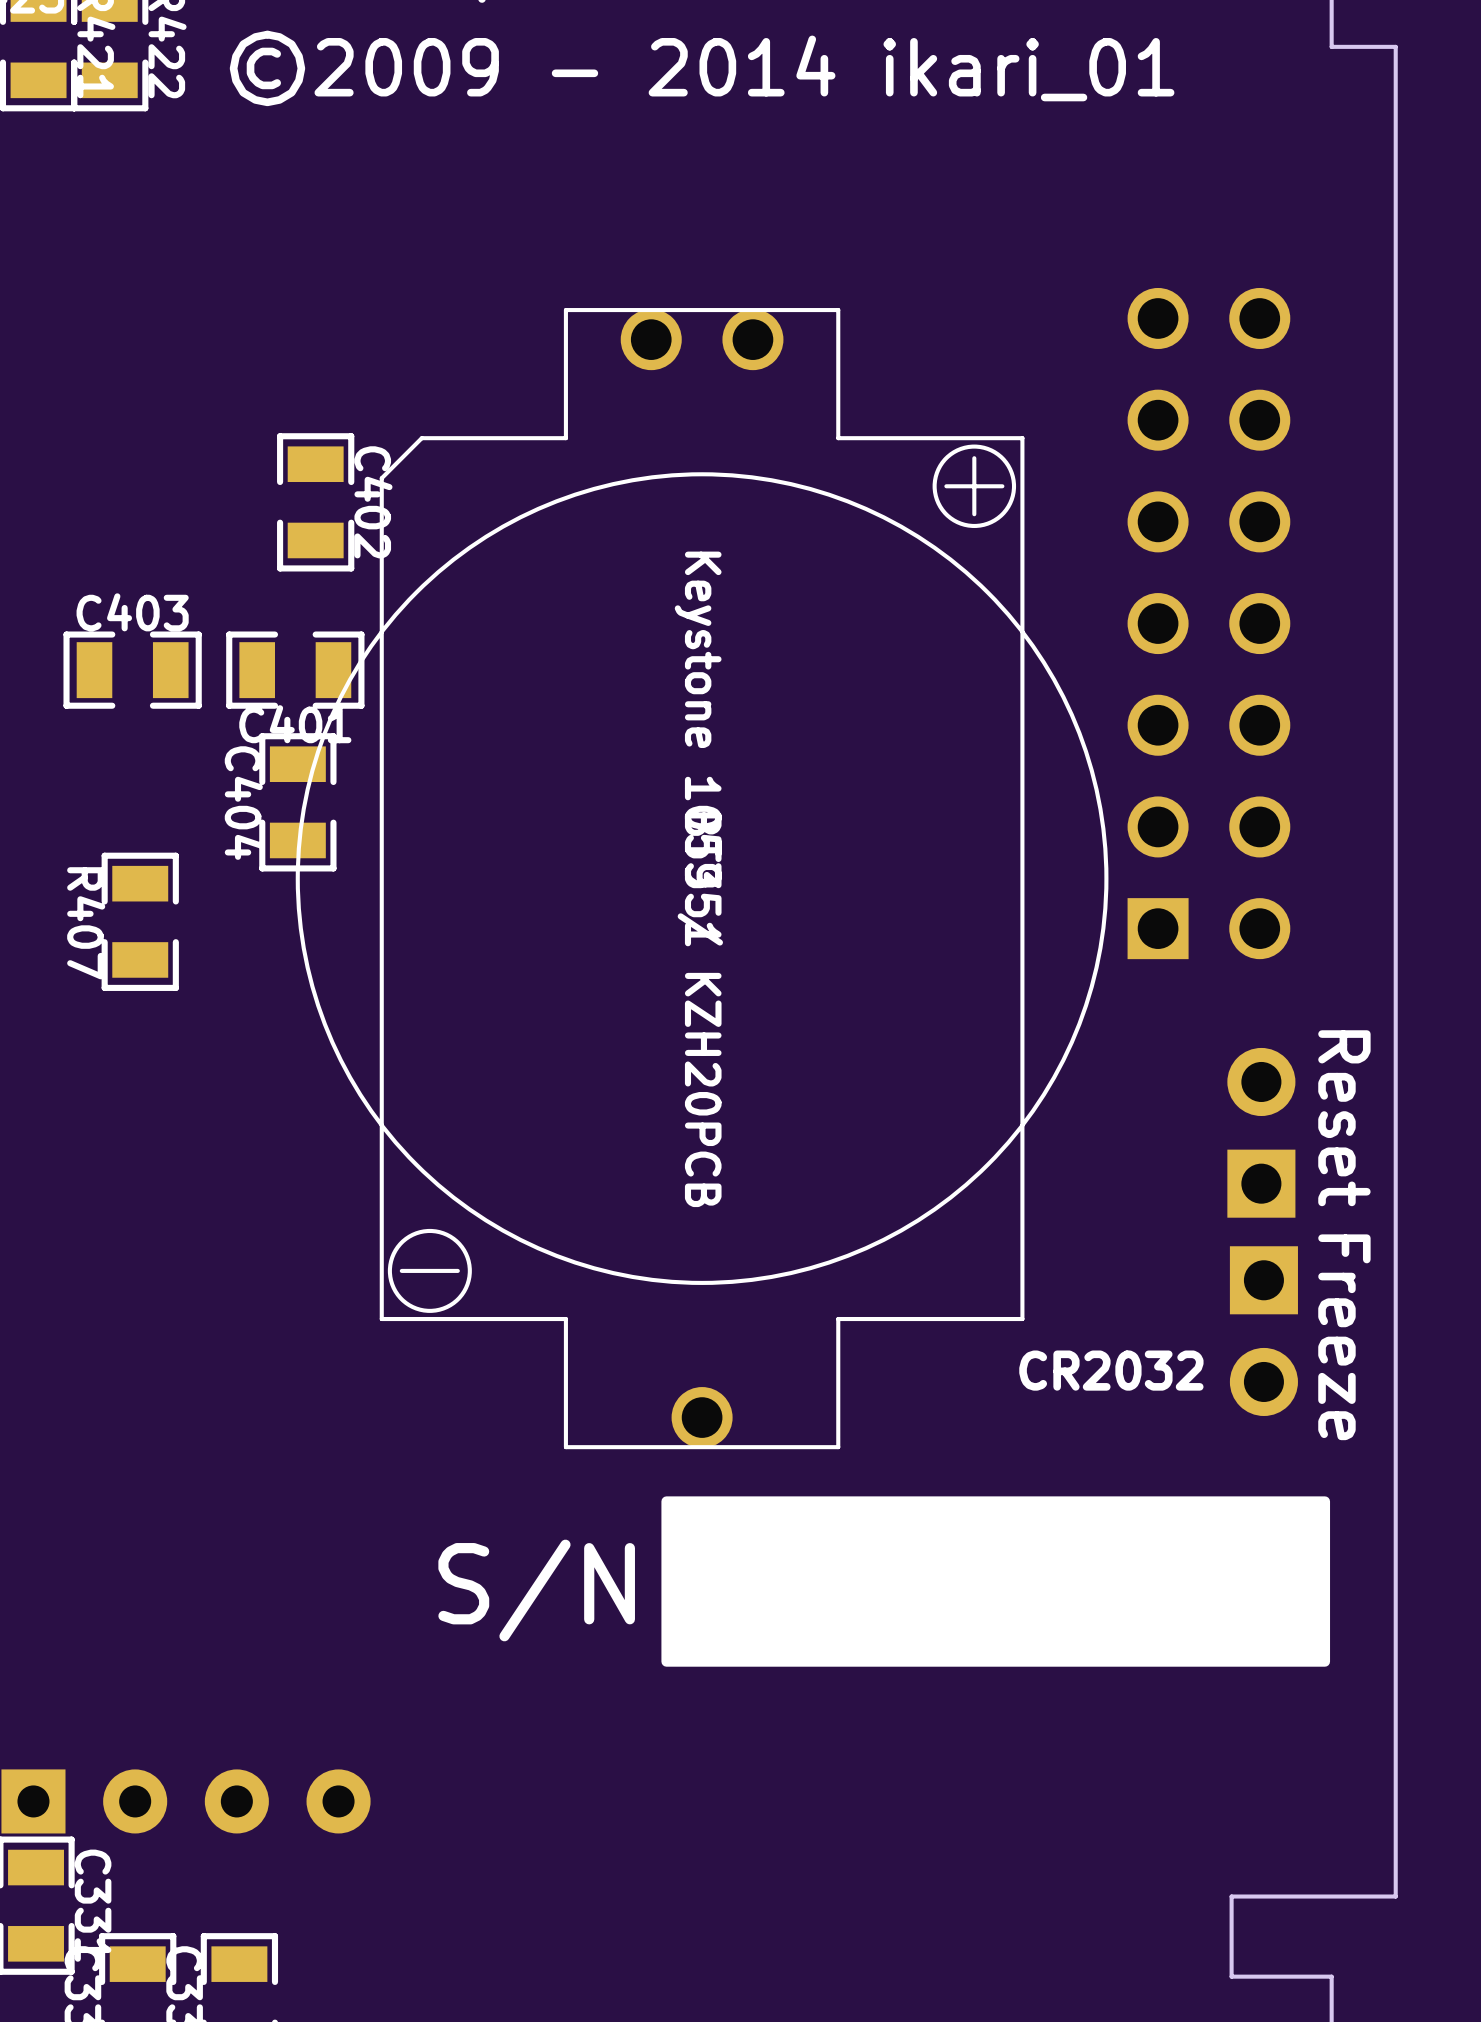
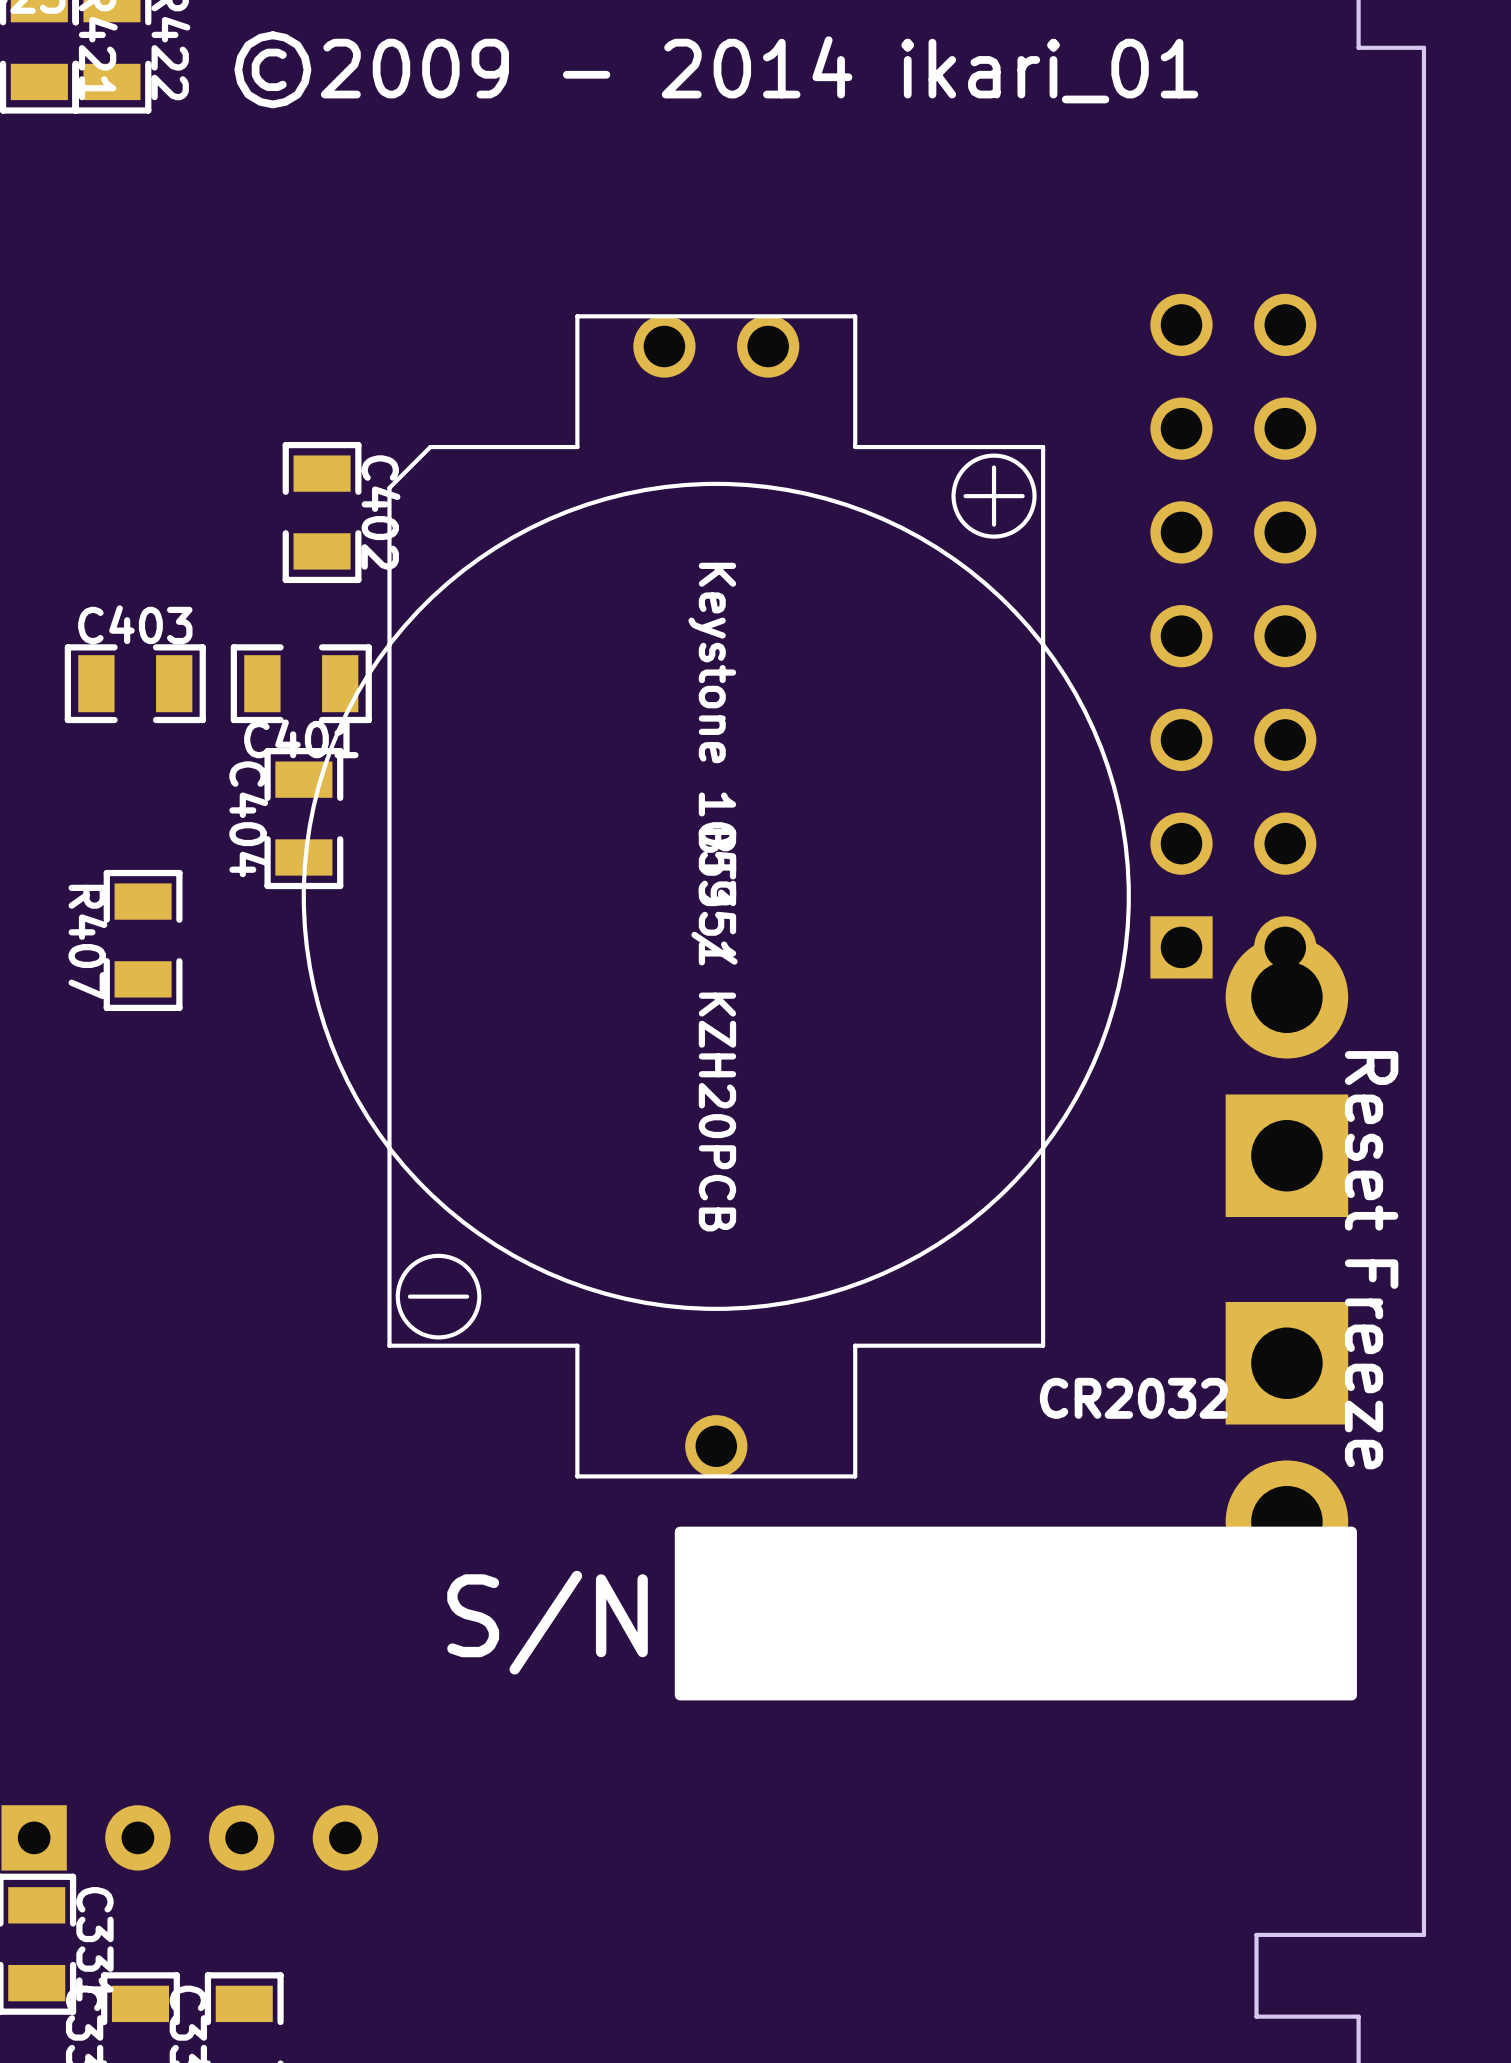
part: none -> (1286, 1076)
part: (1261, 1132) -> none
part: (1263, 1331) -> none
part: none -> (1286, 1442)

